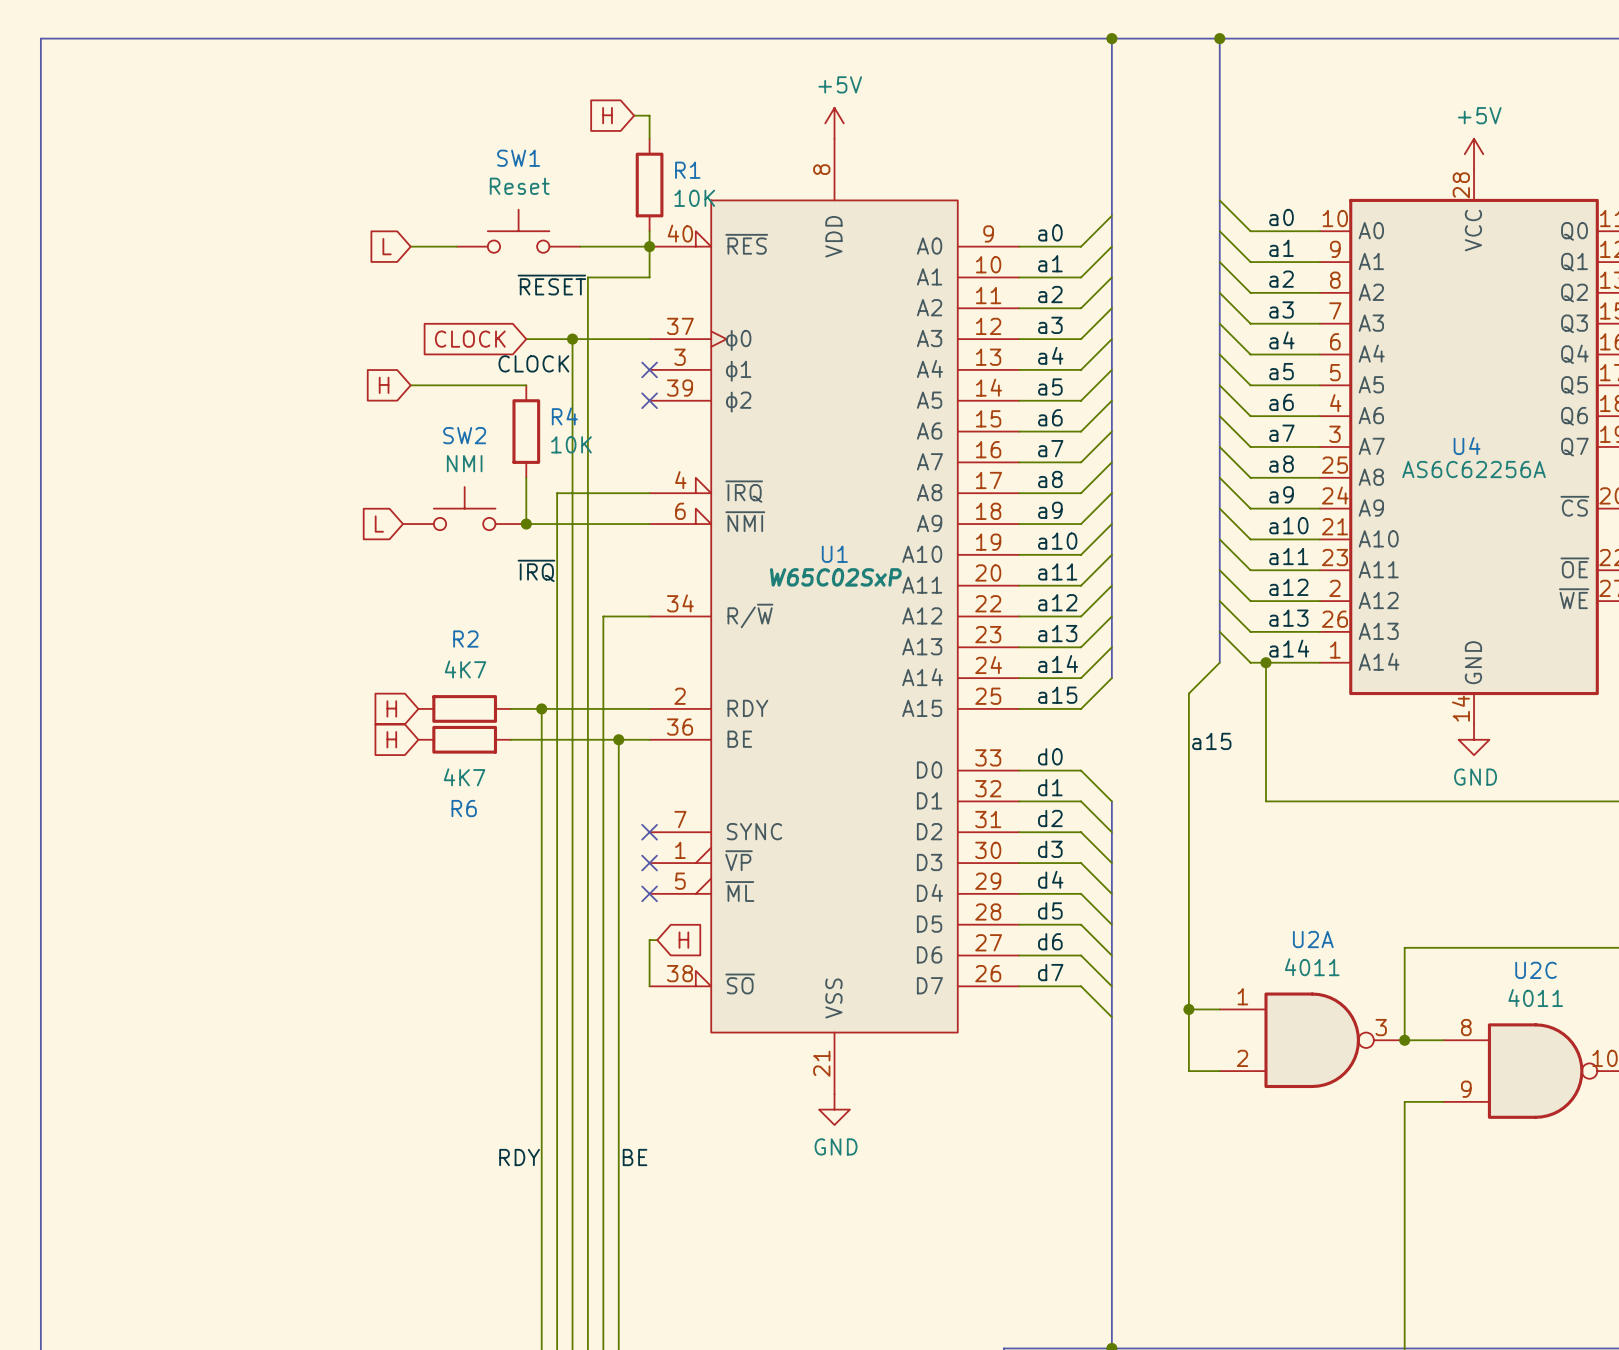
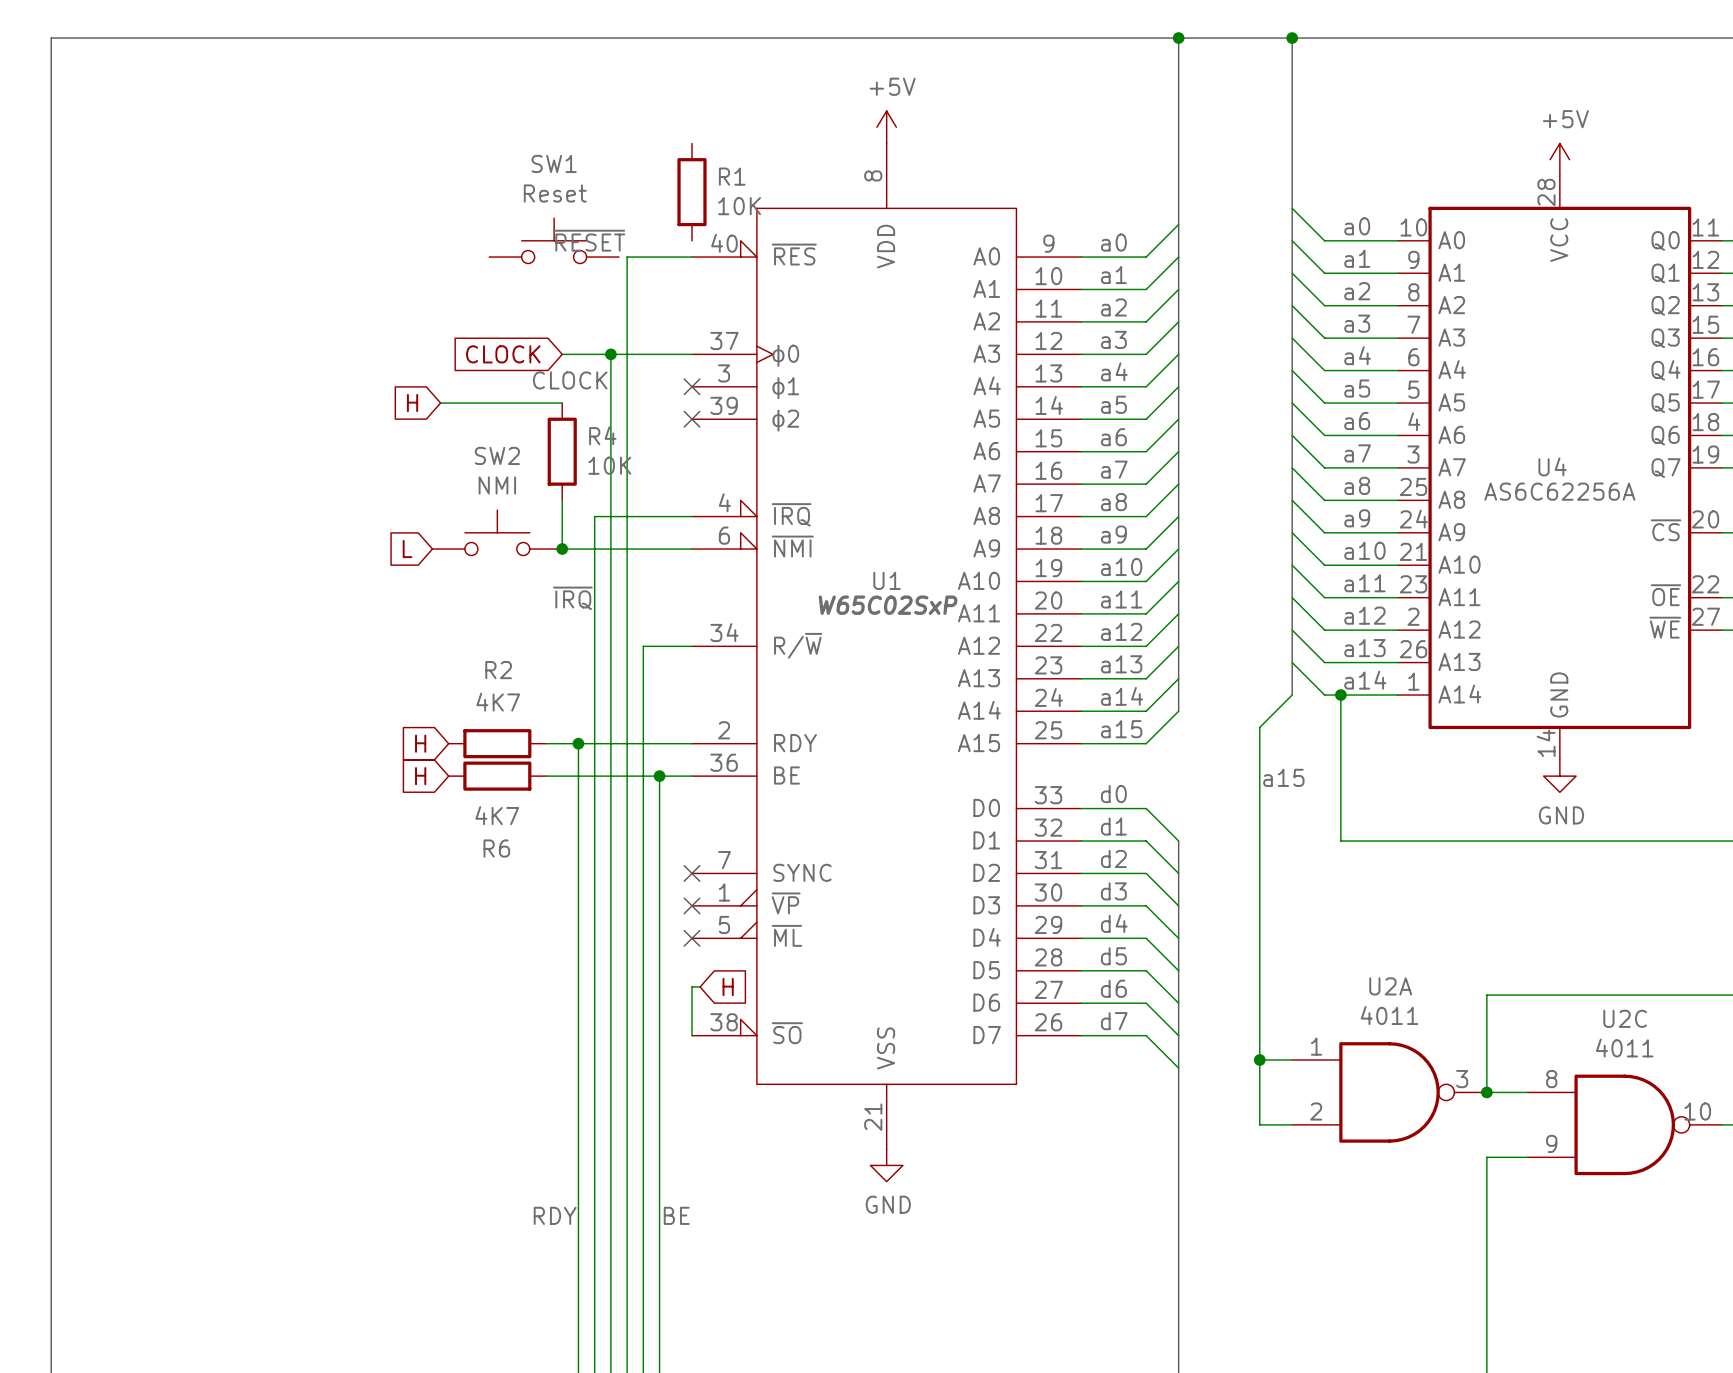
global label: H (607, 115) -> none
wire: (634, 115) (649, 115) (649, 138) -> none
wire: (649, 231) (649, 277) (587, 277) -> none
global label: L (387, 246) -> none
wire: (410, 246) (456, 246) -> none
wire: (580, 246) (587, 246) -> (627, 289) (627, 257)
junction: (649, 246) -> none
label position: ~{RESET} (551, 285) -> ~{RESET} (589, 240)

